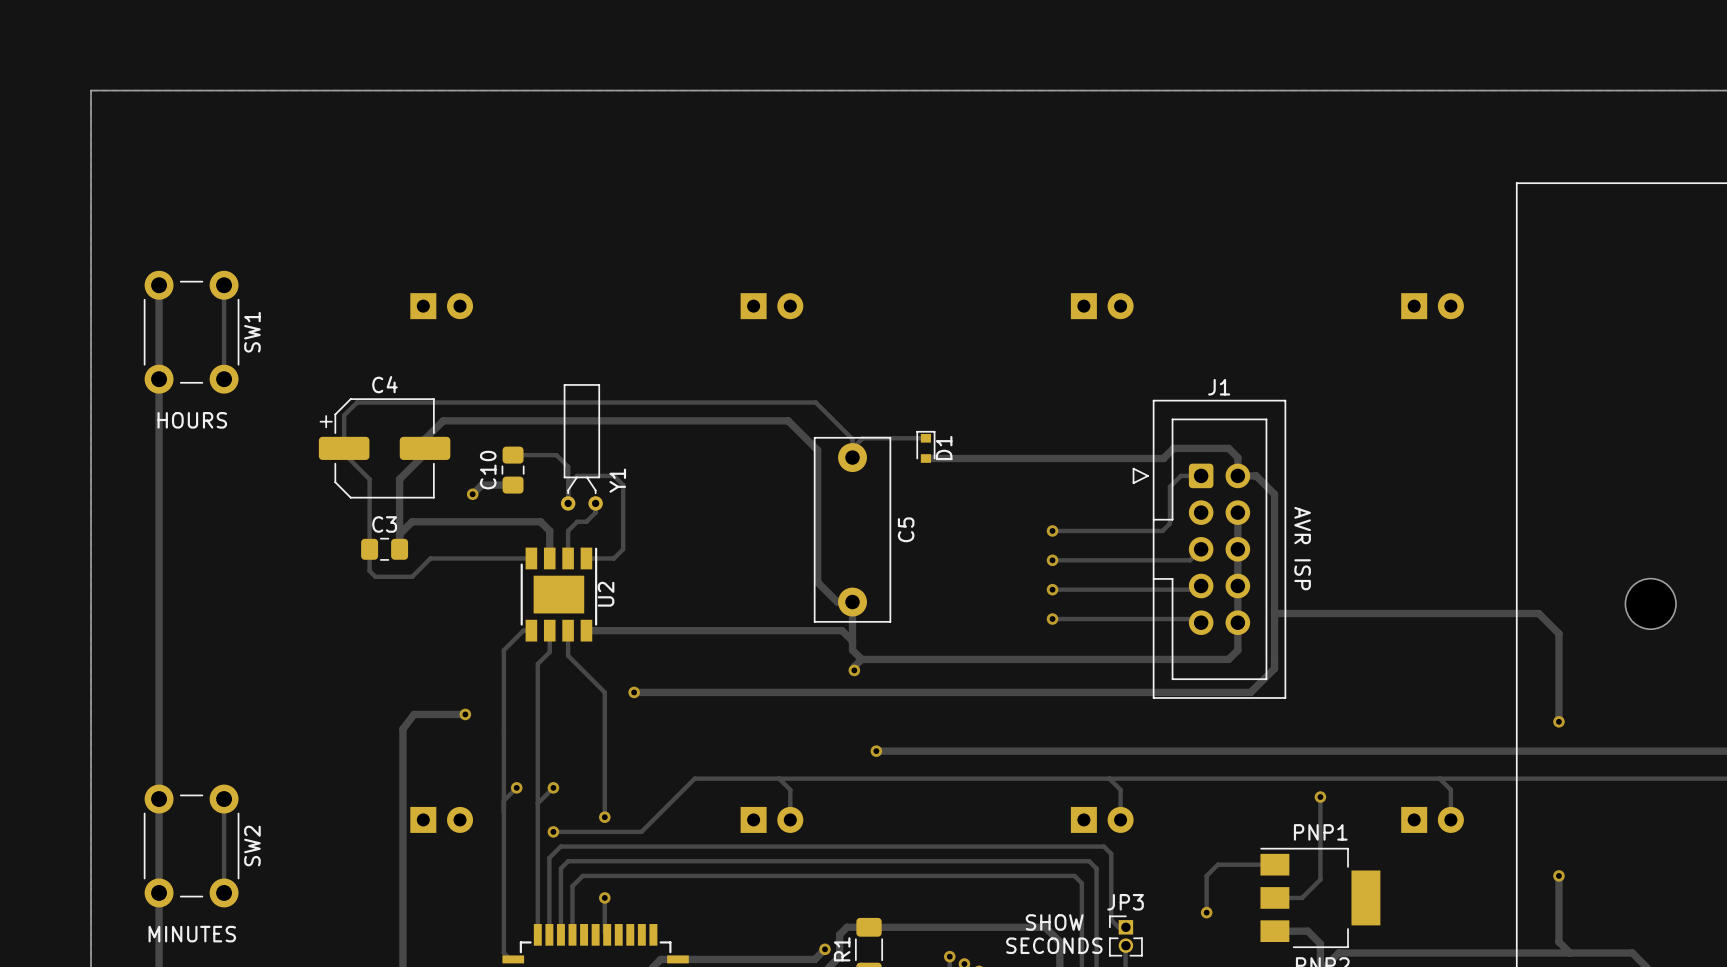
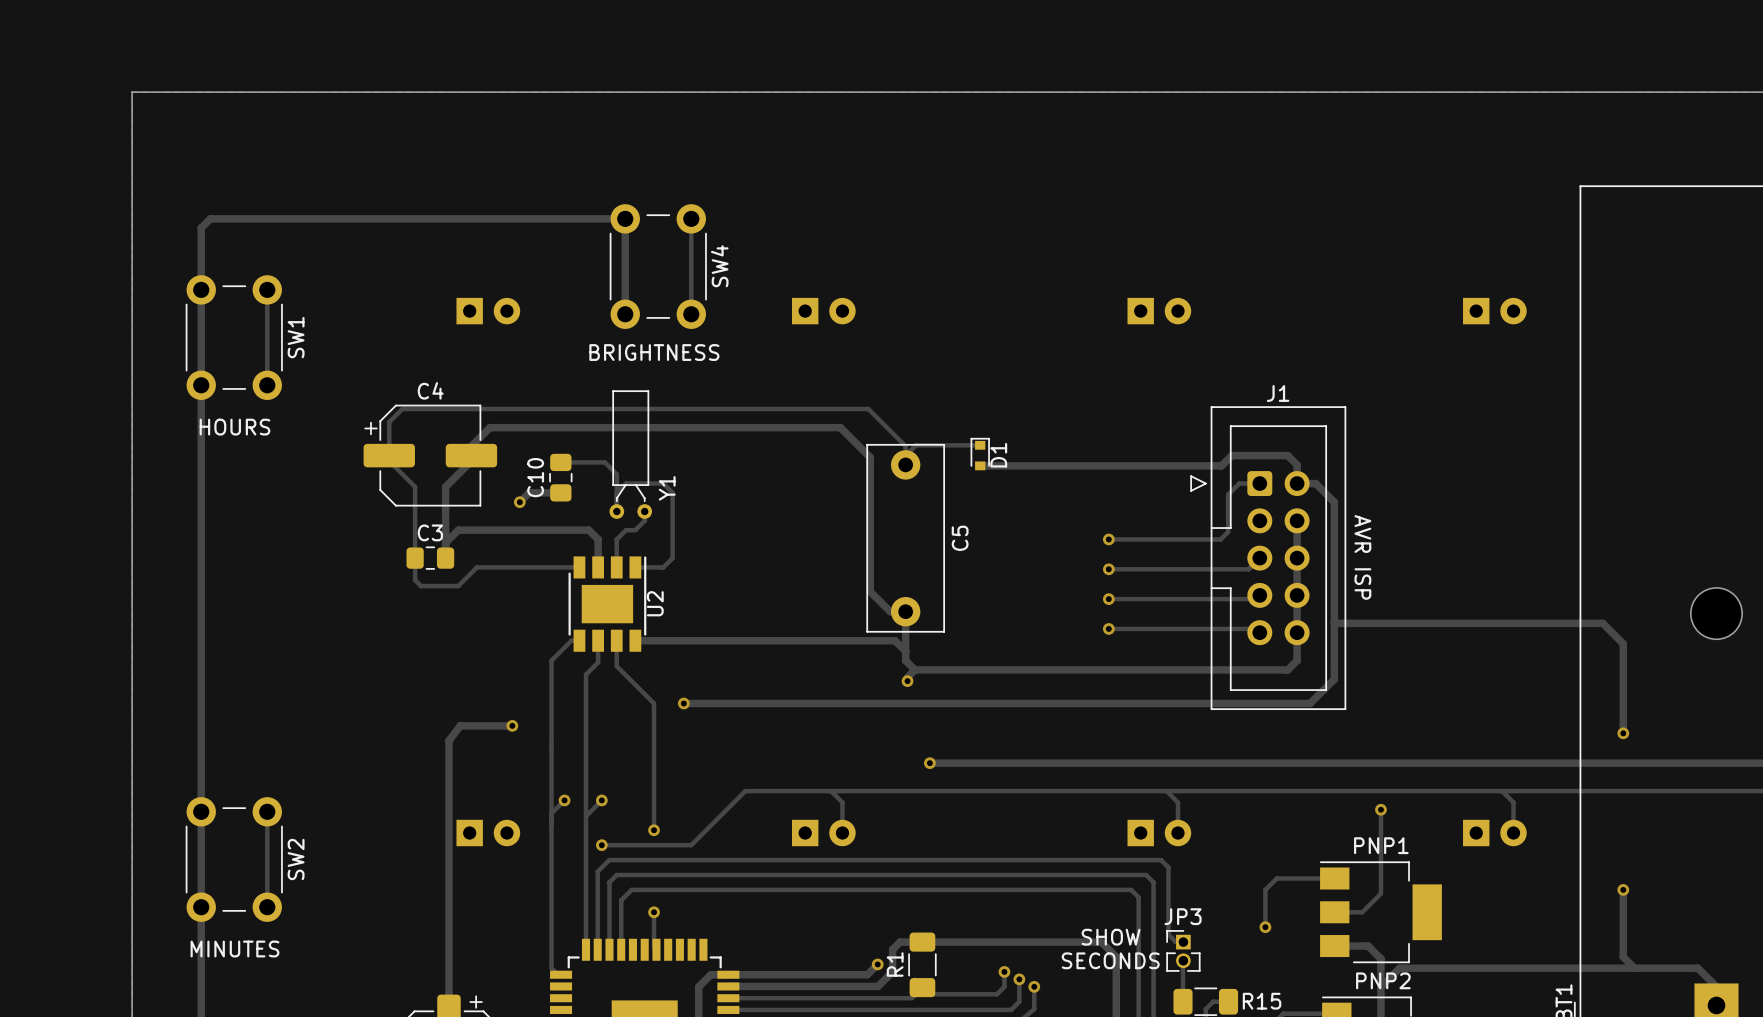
track: none -> (691, 218) (691, 314)
SW4: none -> (658, 266)
track: none -> (201, 289) (201, 228) (210, 218) (625, 218) (625, 314)
text: none -> BRIGHTNESS (654, 352)

